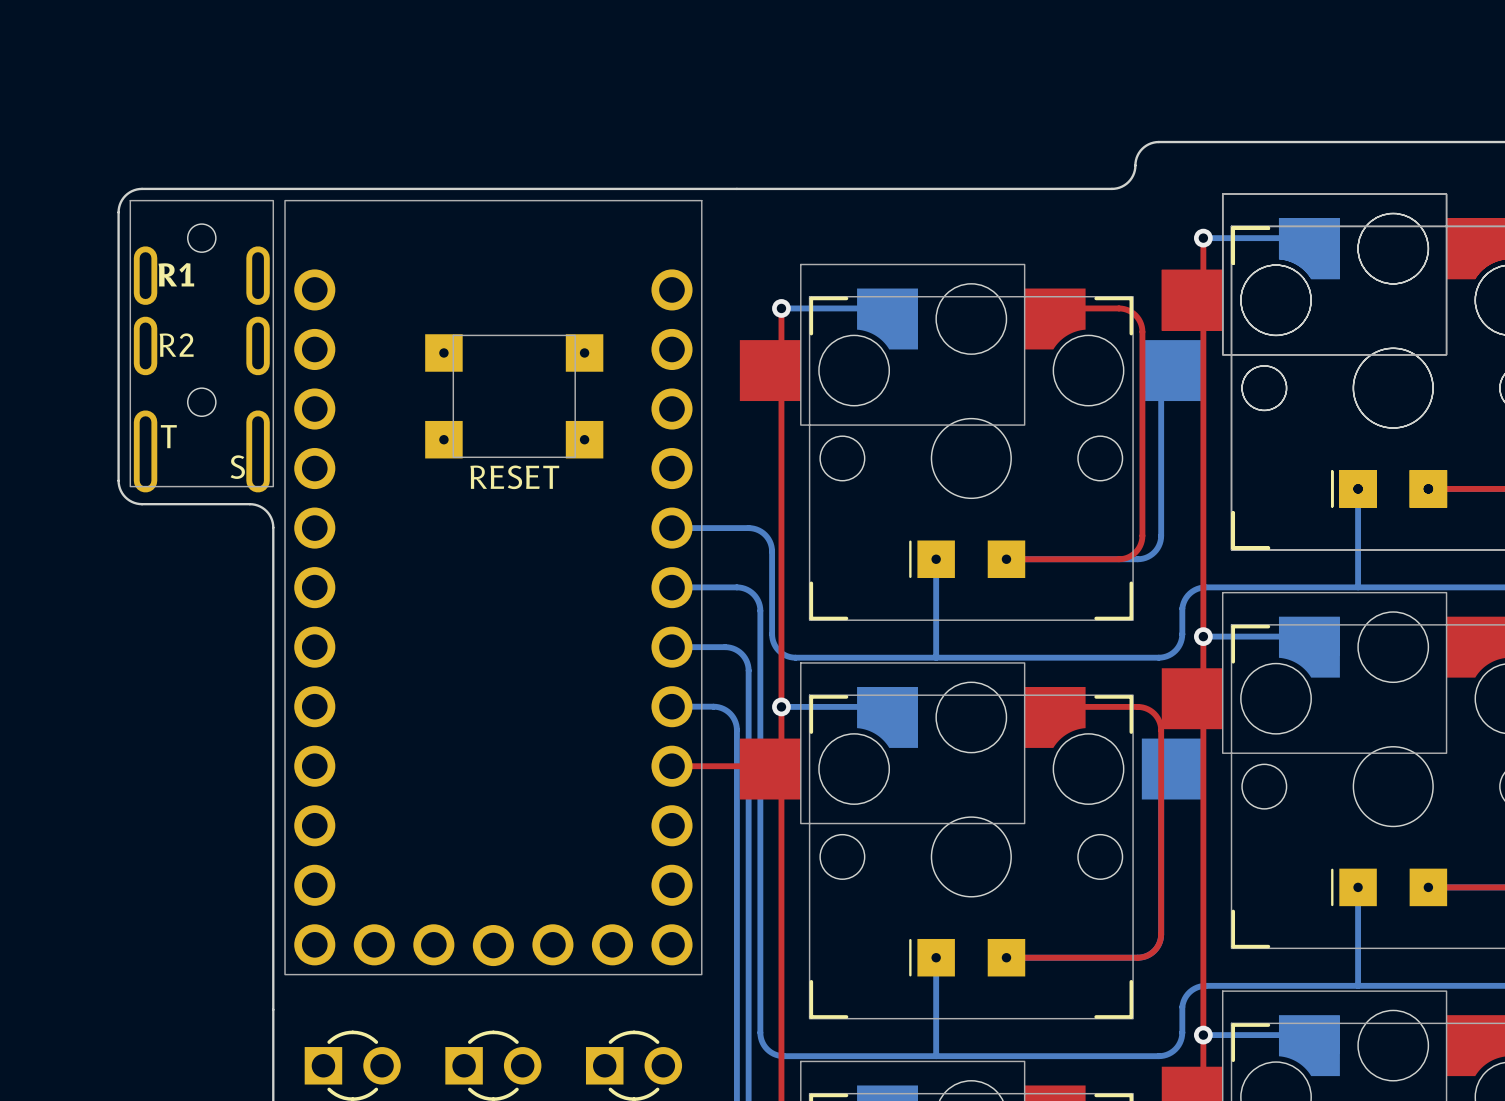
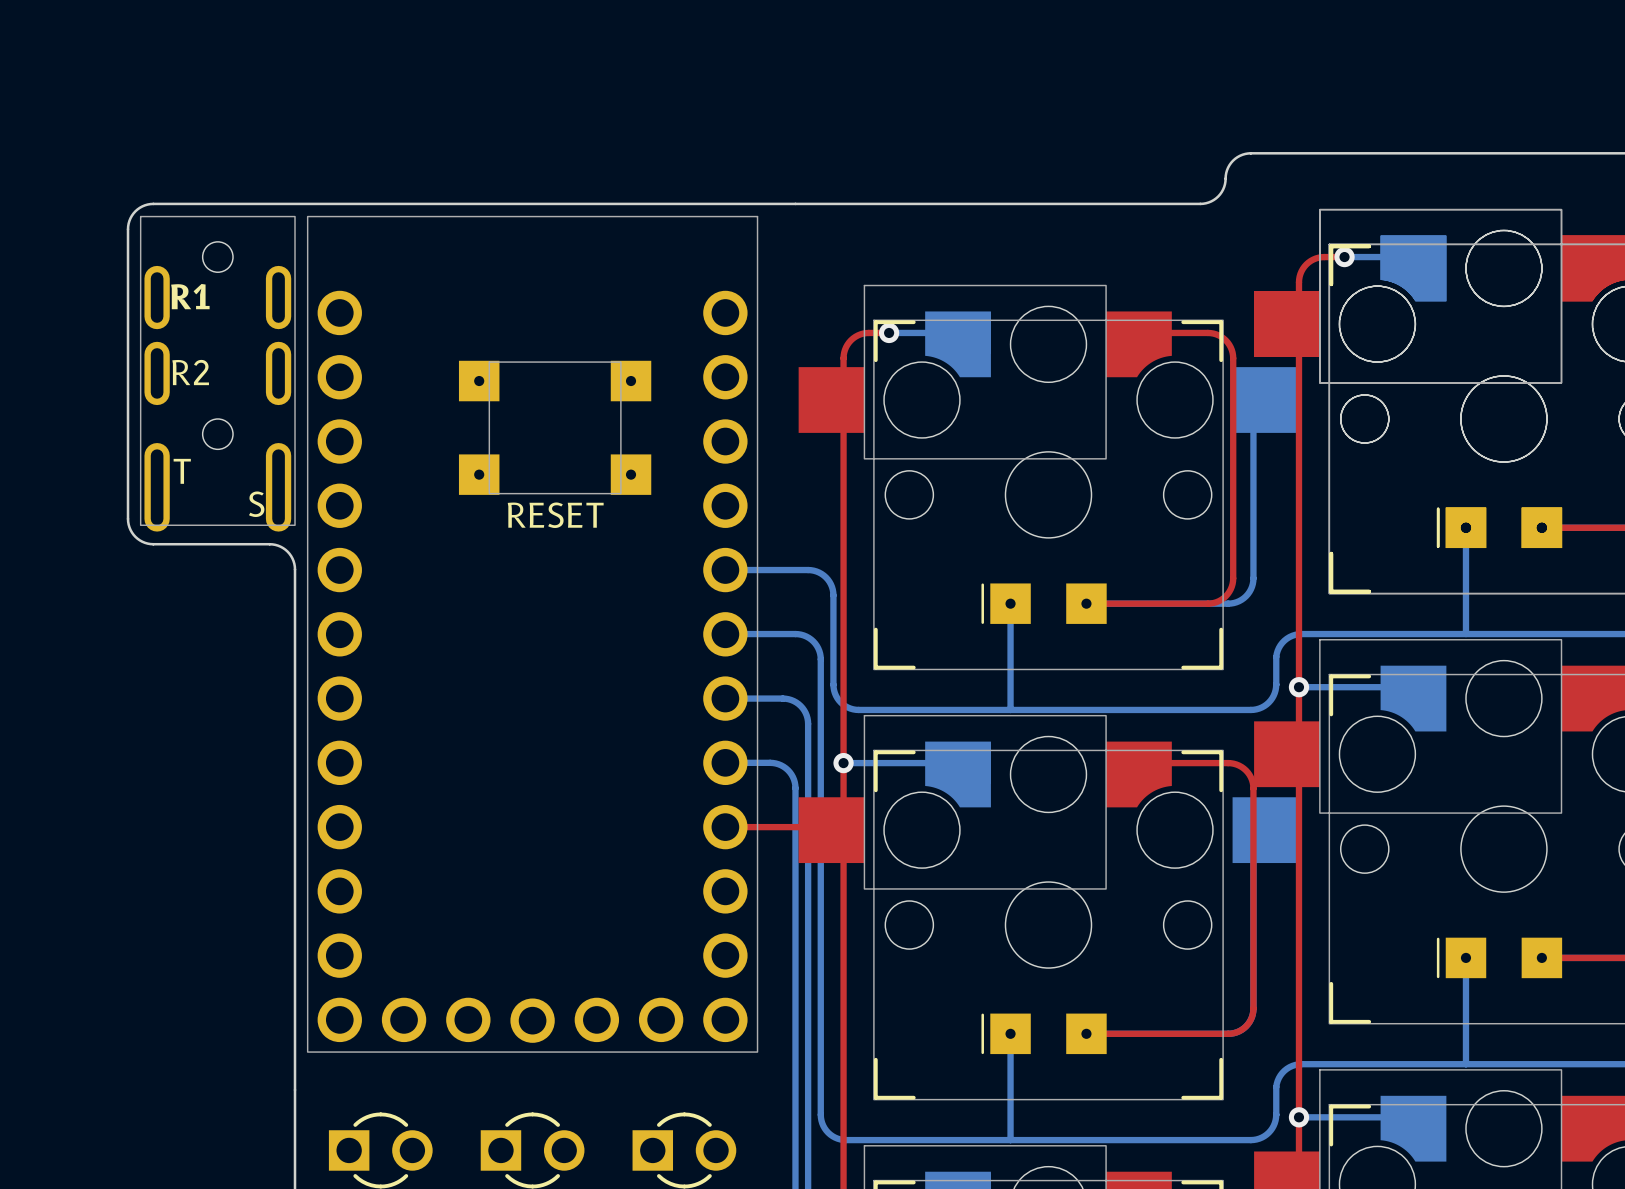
top track: (1203, 238) (1203, 261) -> (1344, 257) (1321, 257) (1310, 260) (1301, 271) (1298, 282)
bottom track: (1203, 238) (1245, 238) -> none
via position: (1203, 238) -> (1344, 257)
top track: (781, 308) (781, 331) -> (889, 332) (866, 333) (855, 336) (847, 344) (843, 358)
bottom track: (781, 308) (823, 308) -> none
via position: (781, 308) -> (889, 332)

